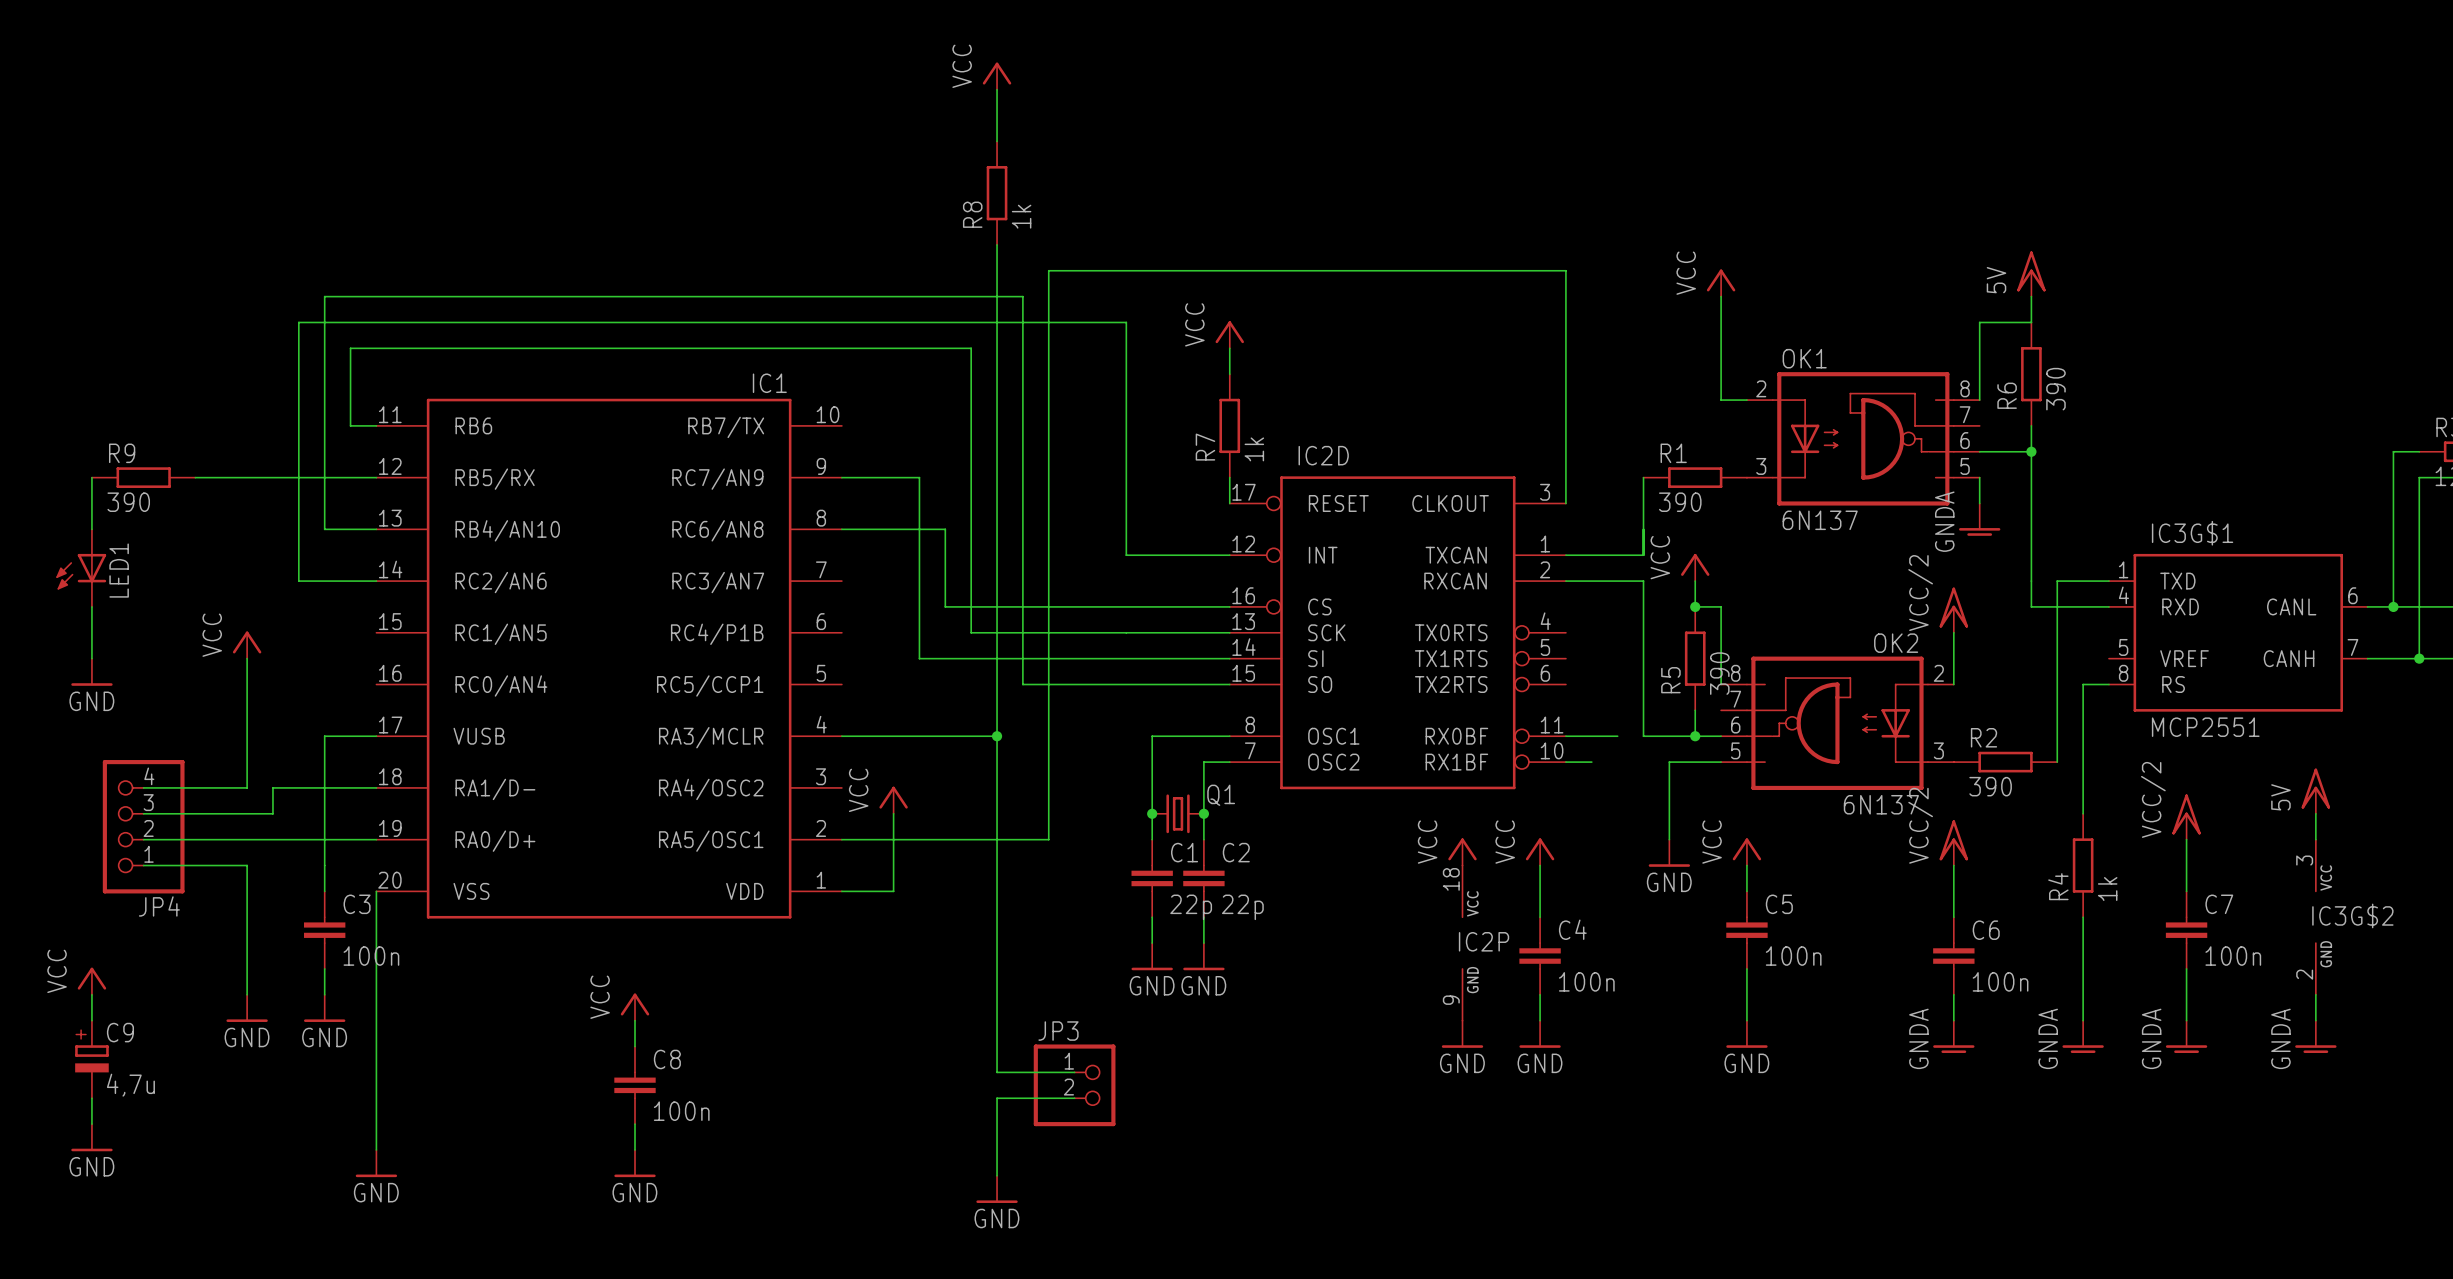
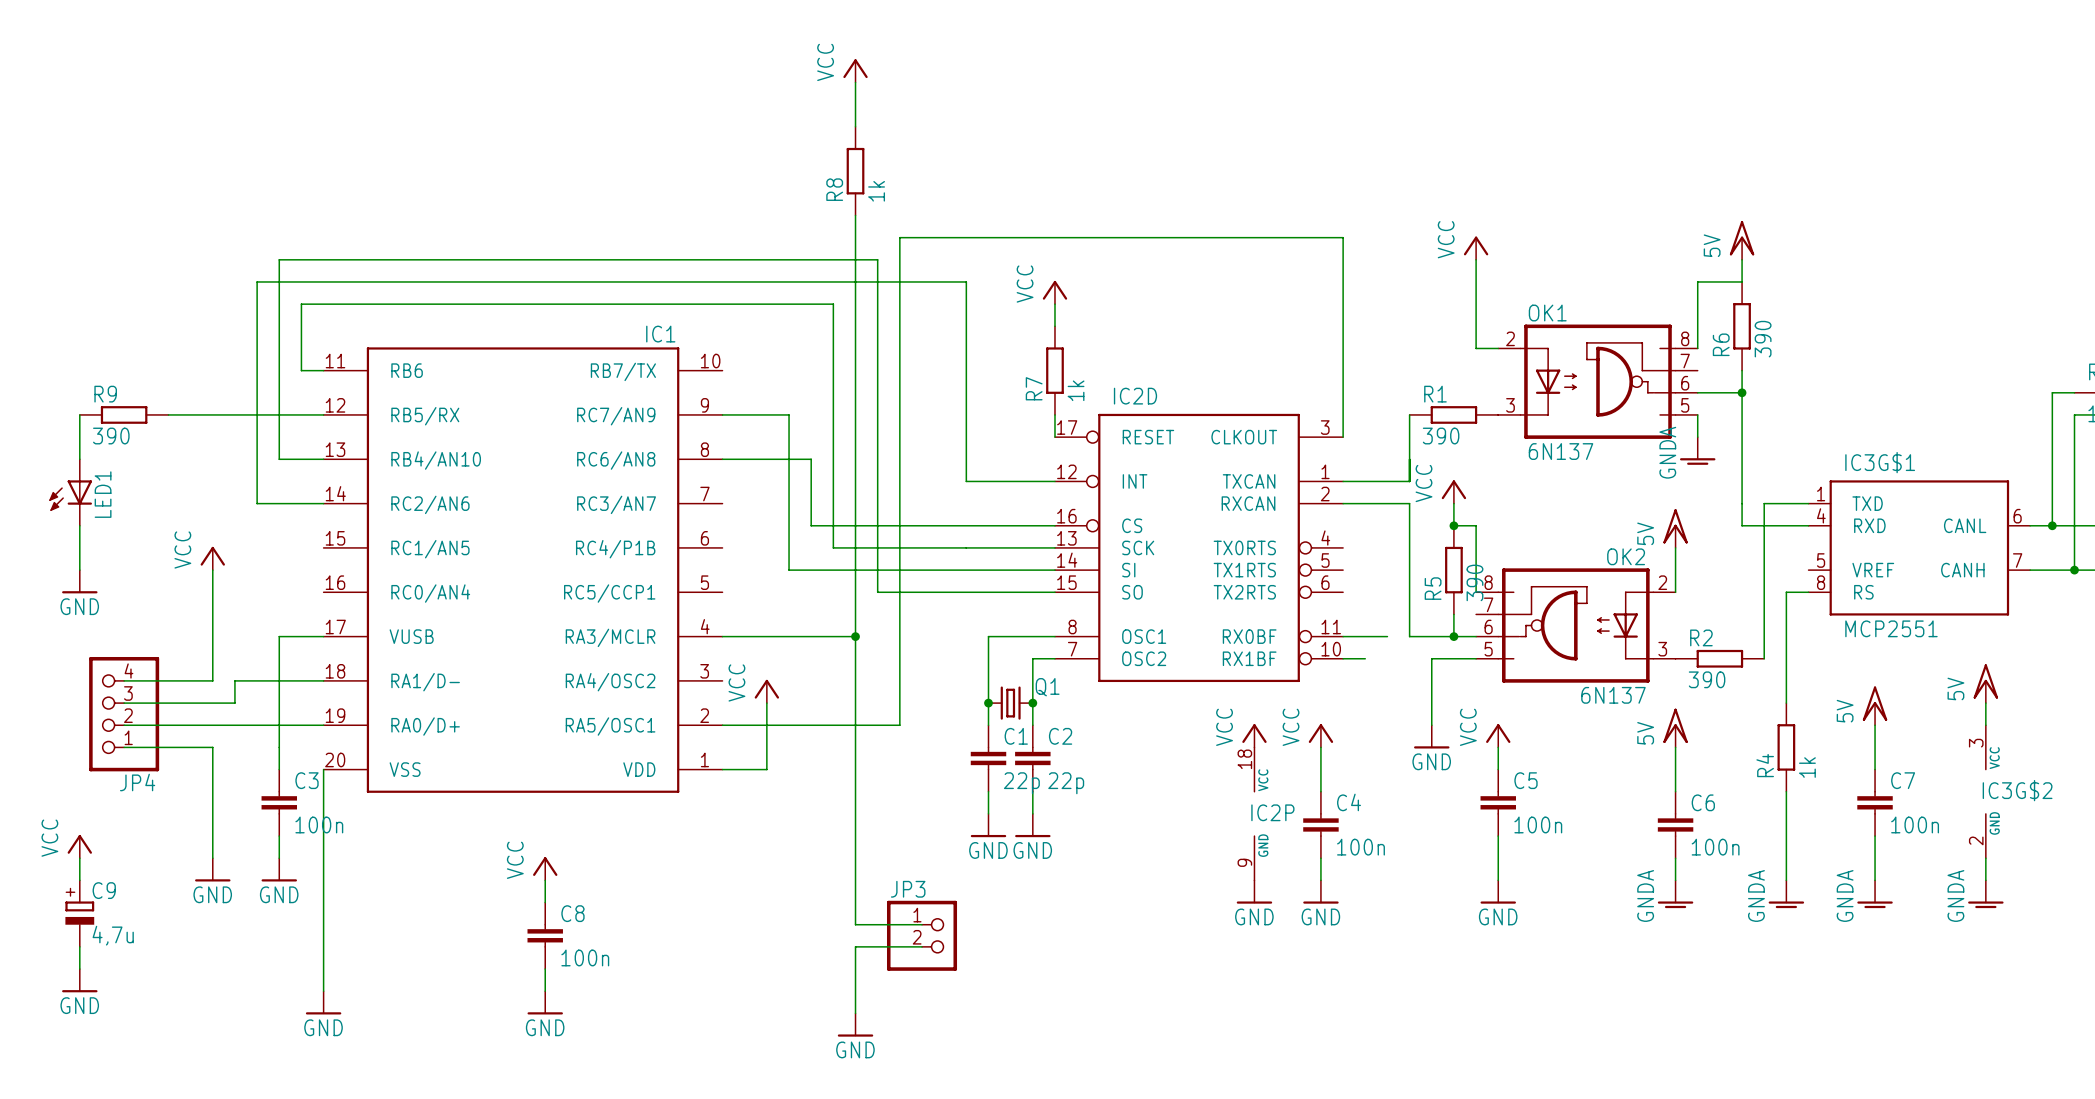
power symbol: VCC/2 (1953, 610) -> 5V (1675, 528)
power symbol: VCC/2 (2186, 817) -> 5V (1875, 705)
power symbol: VCC/2 (1953, 842) -> 5V (1675, 728)

